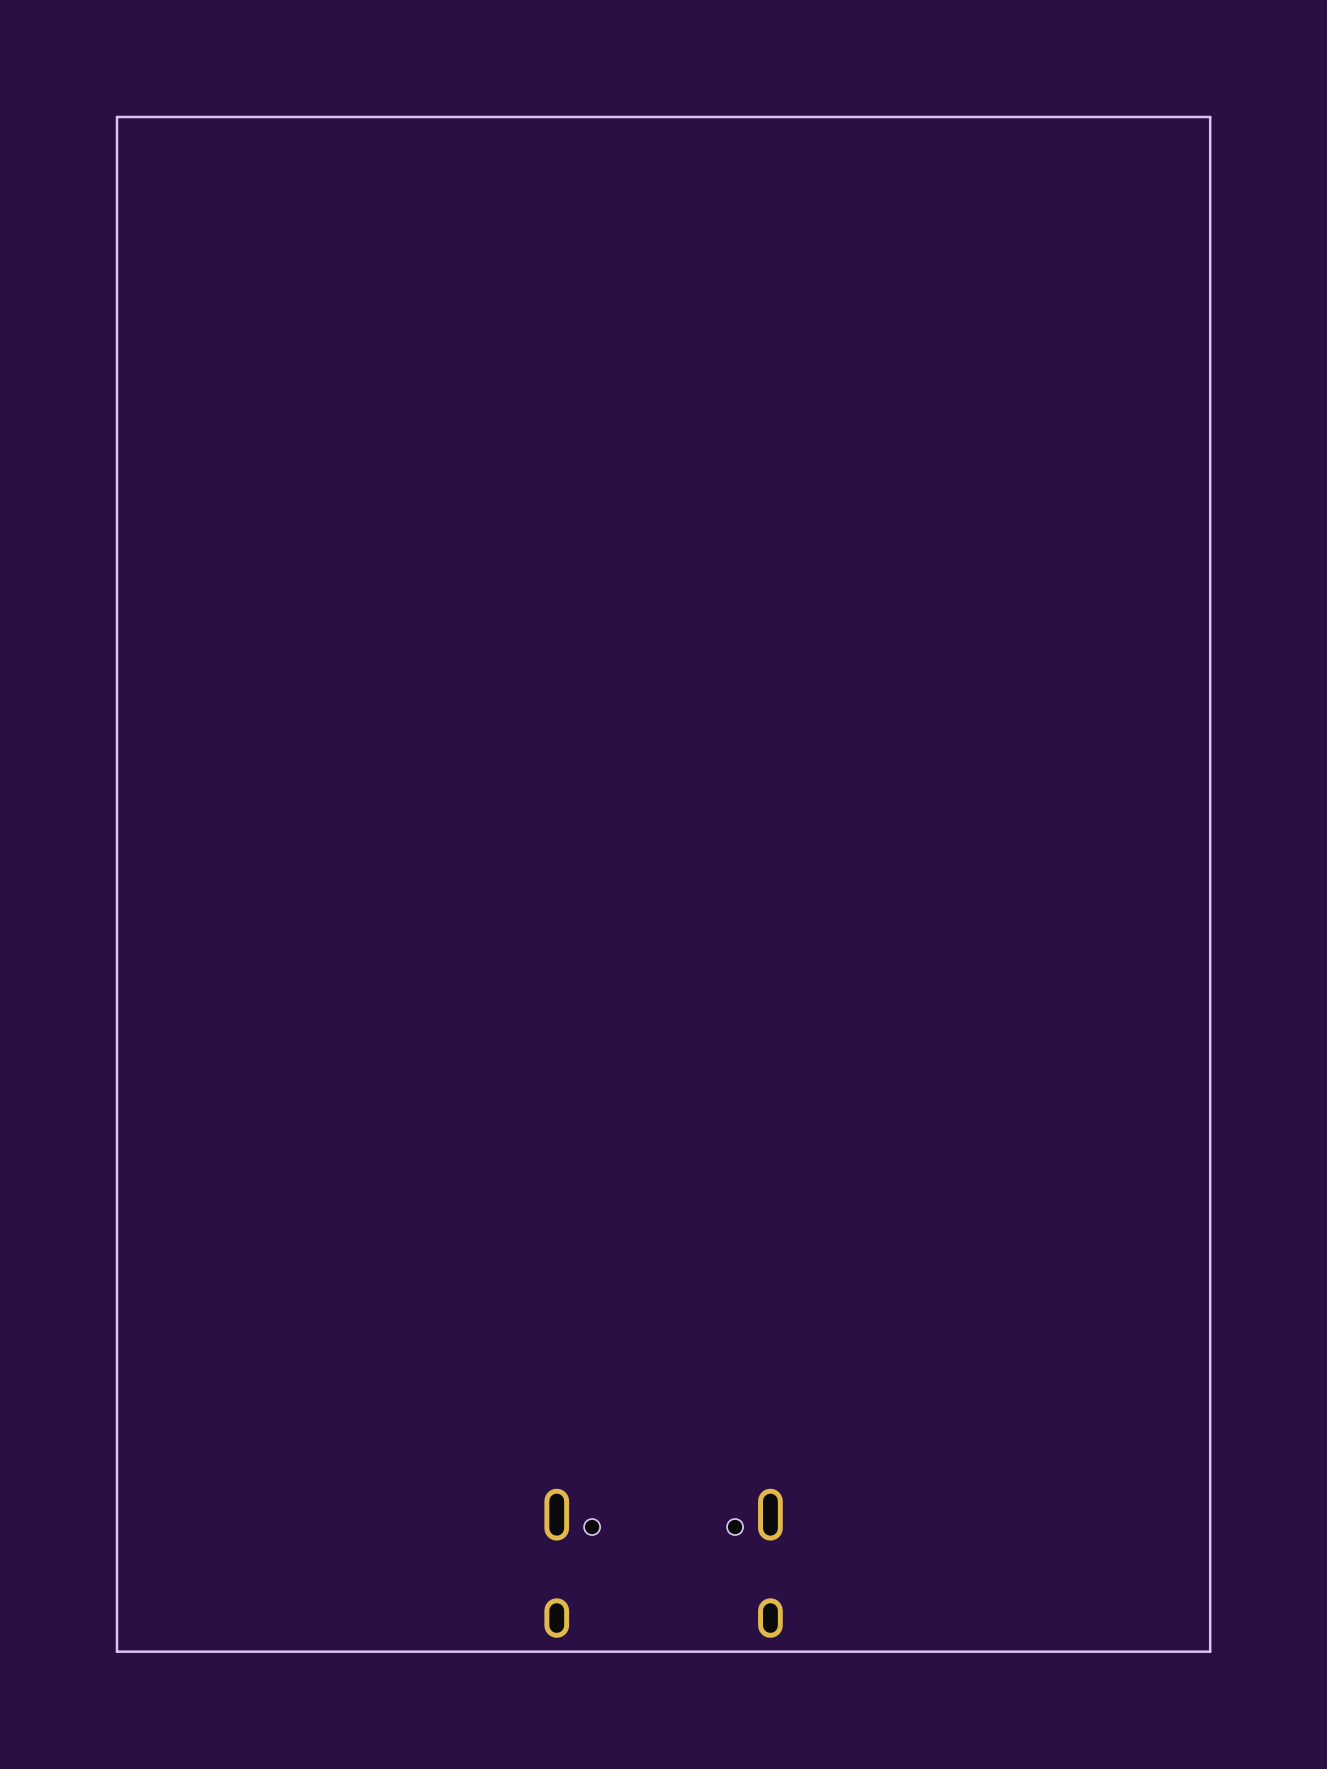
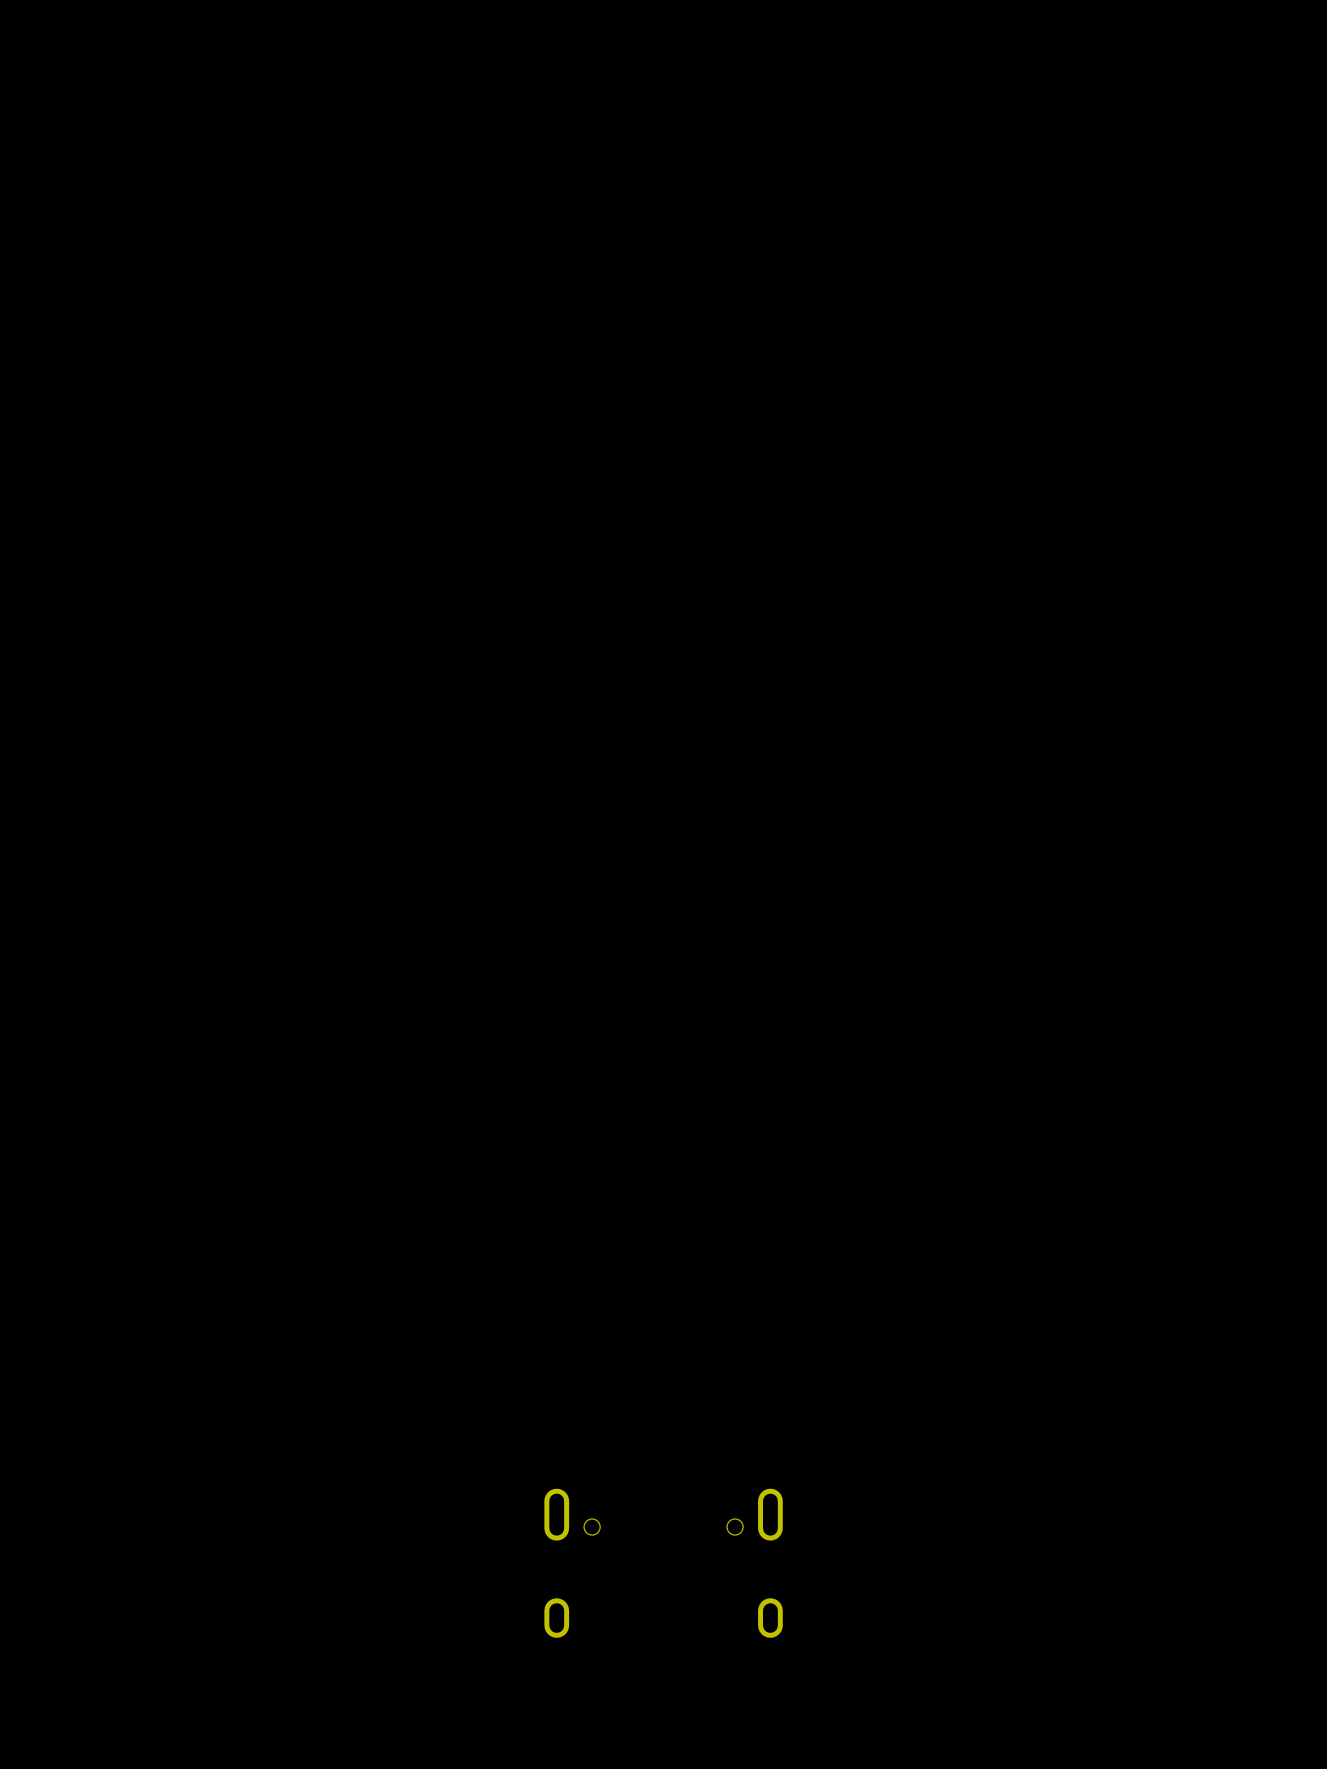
board edge: (1210, 116) (116, 116) (116, 1651) (1210, 1651) (1210, 116) -> none

